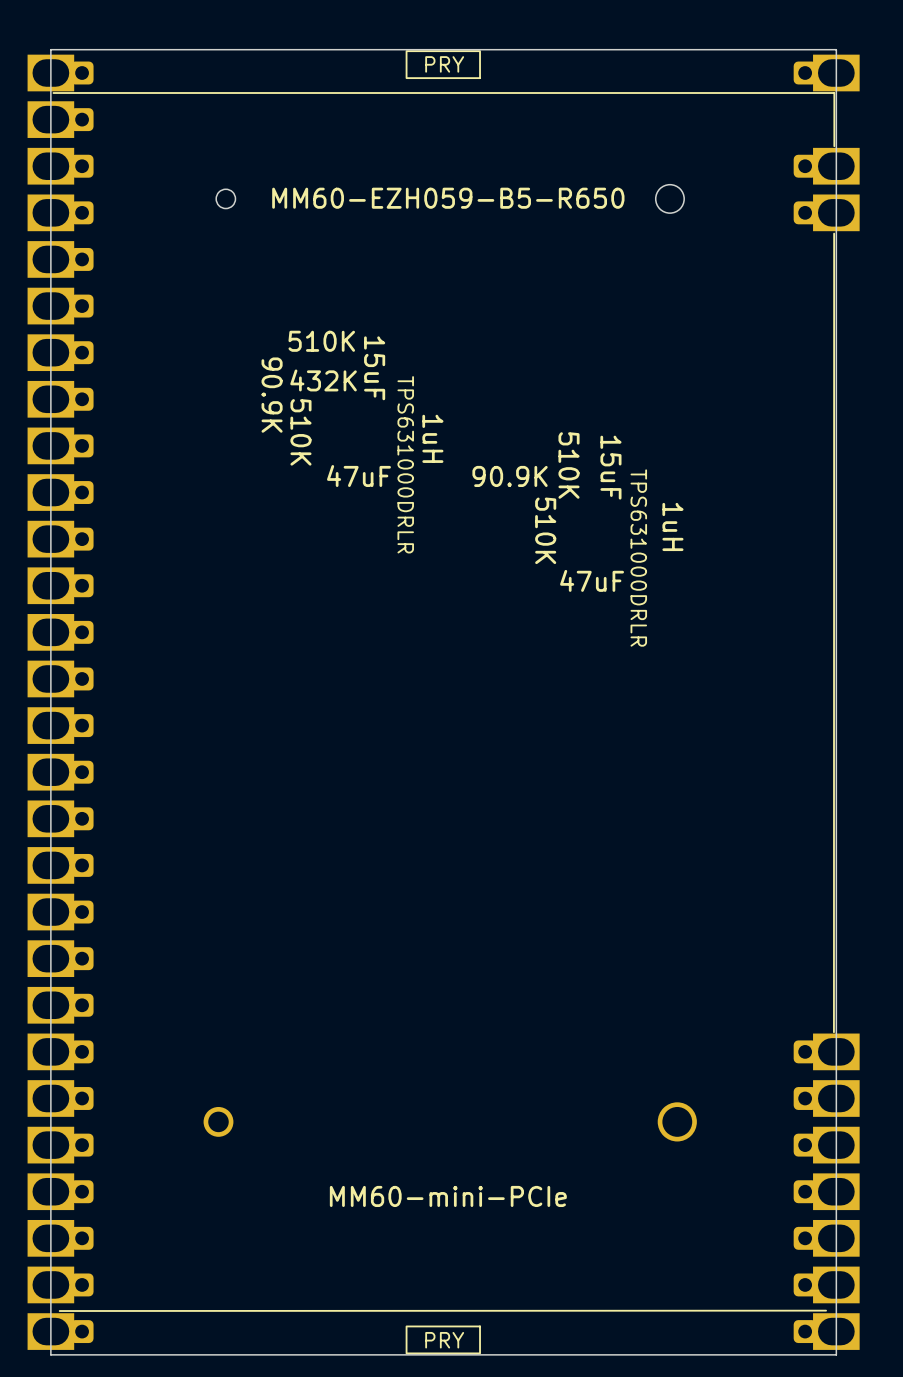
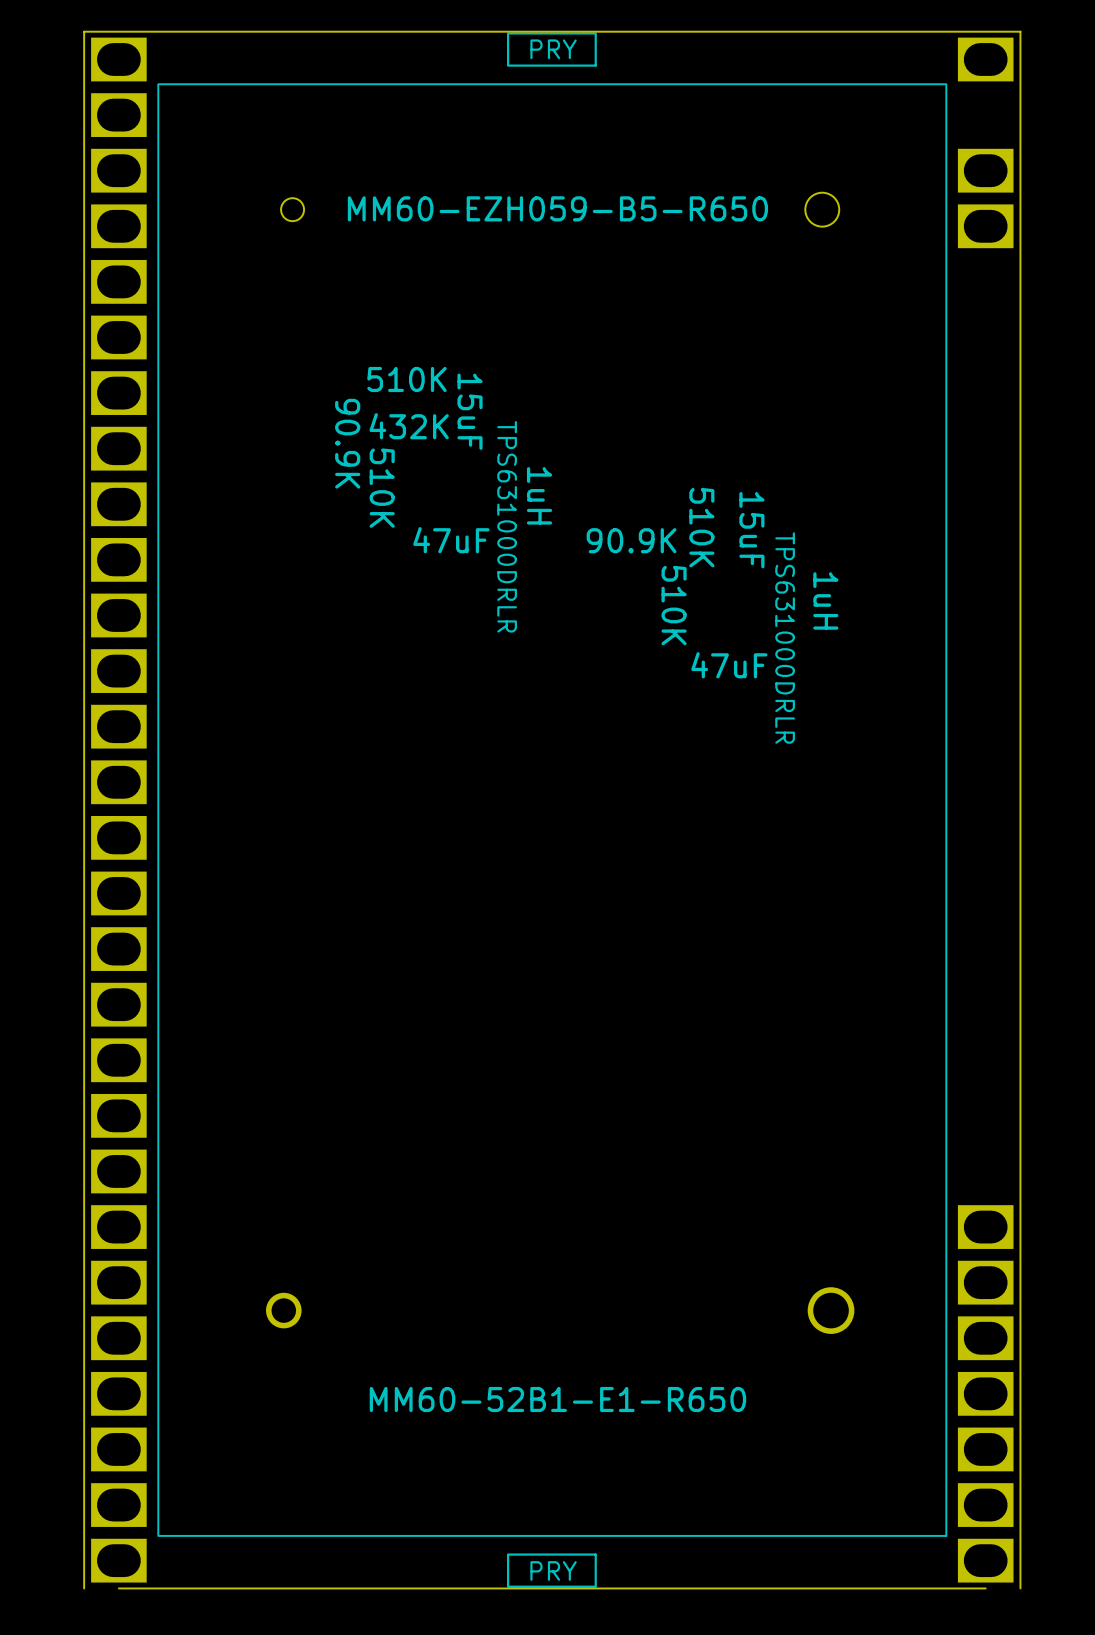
part footprint: [27, 49, 860, 1356] -> [83, 31, 1022, 1590]
part value: MM60-mini-PCIe (448, 1196) -> MM60-52B1-E1-R650 (557, 1399)

